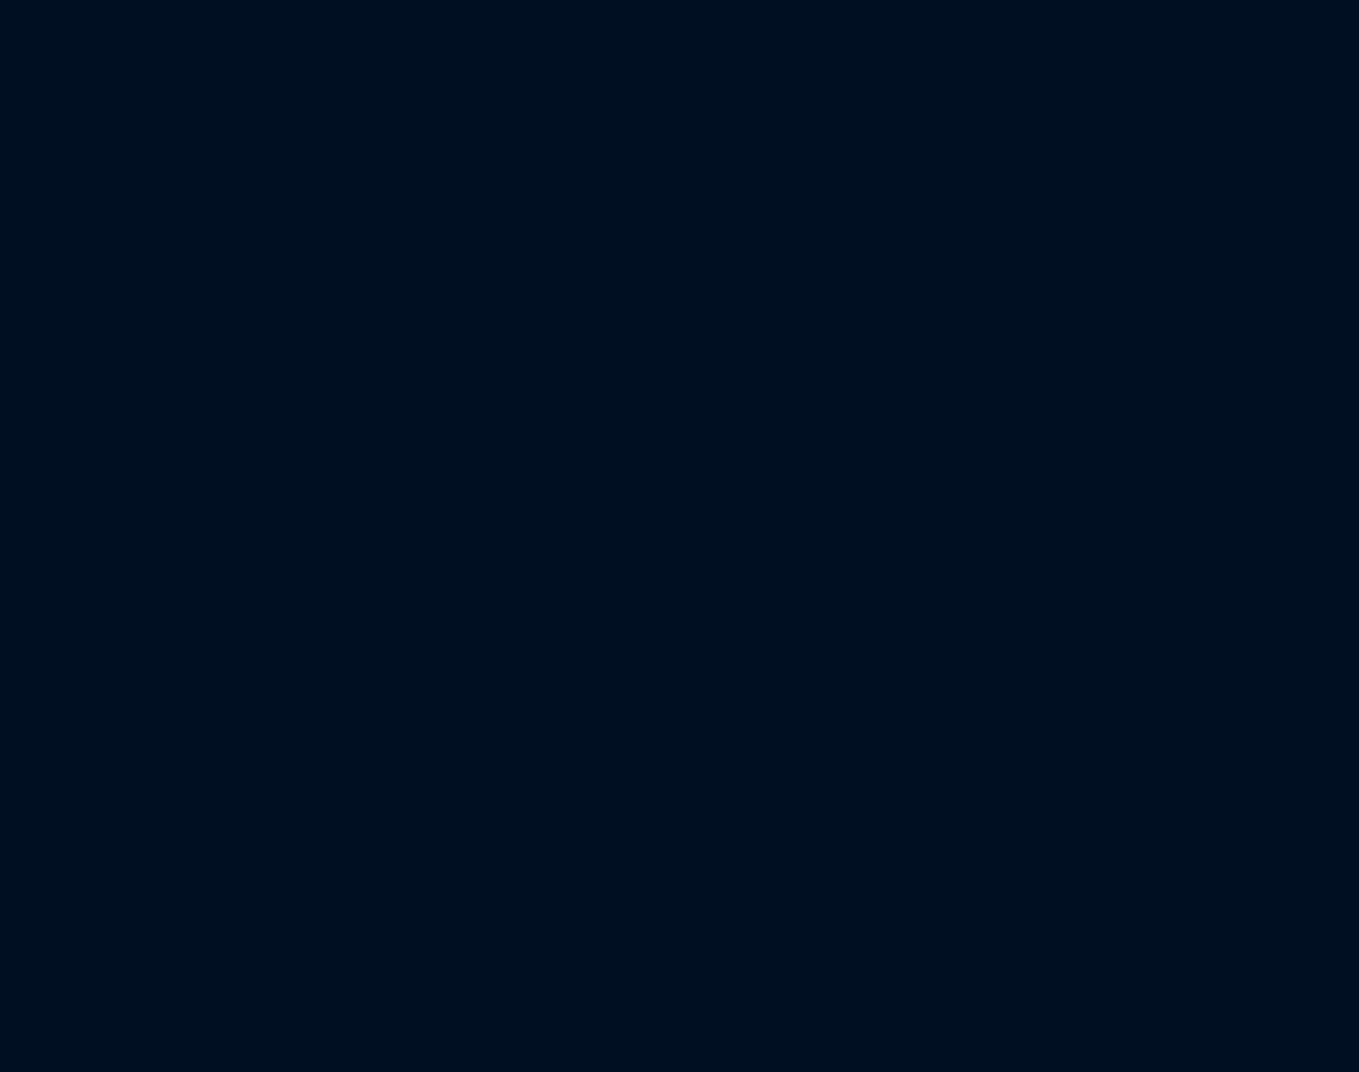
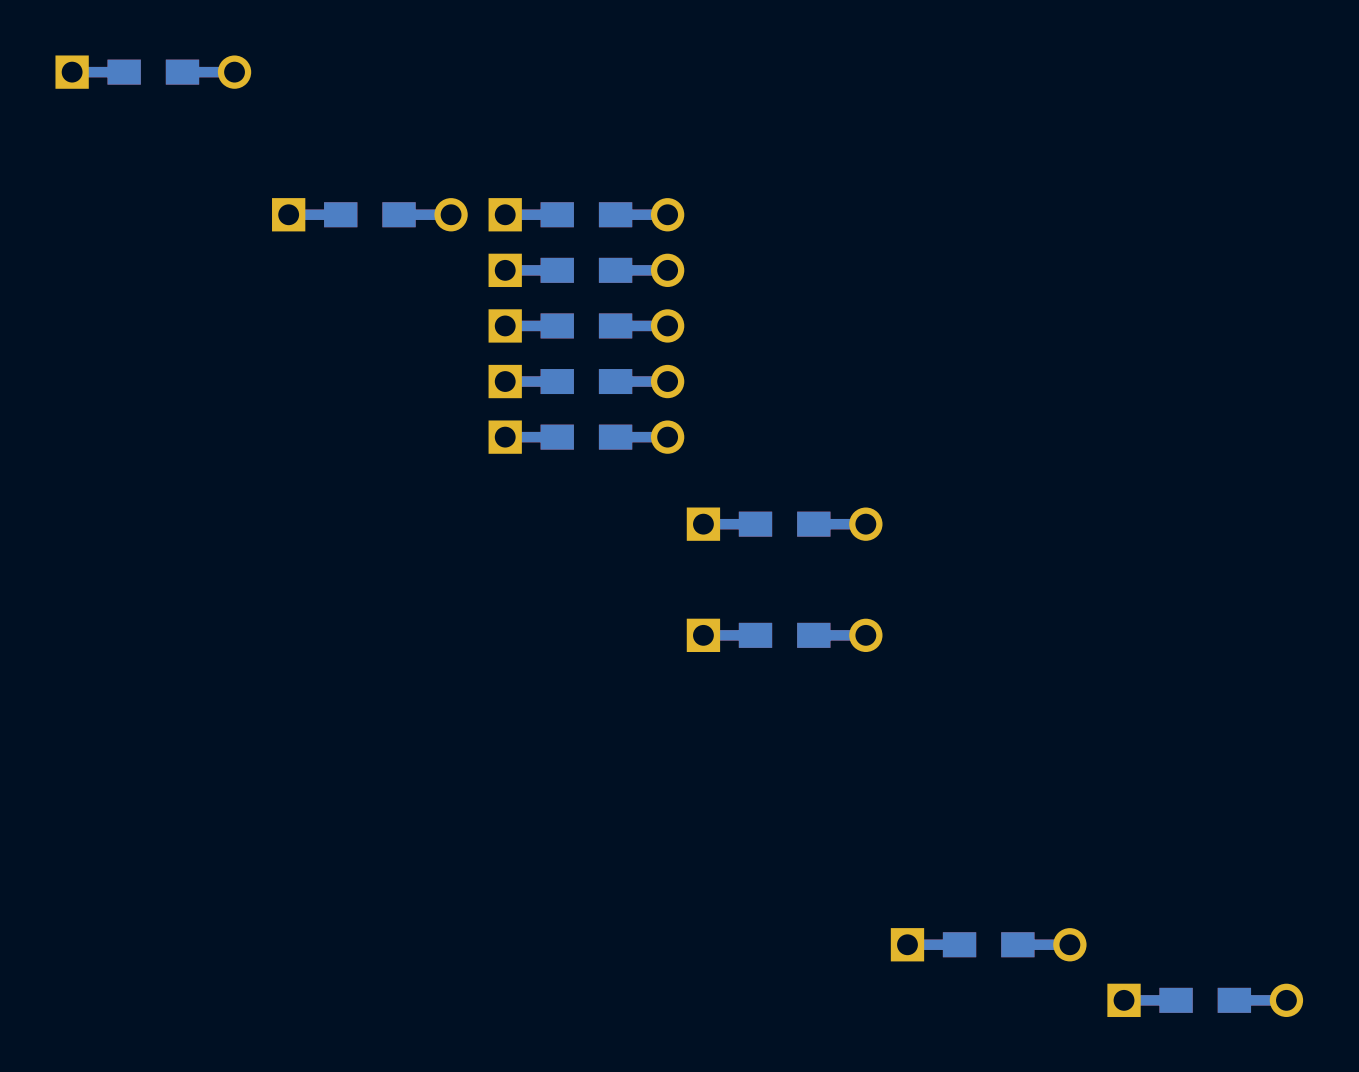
part: none -> (153, 72)
part: none -> (369, 214)
part: none -> (586, 214)
part: none -> (586, 270)
part: none -> (586, 325)
part: none -> (586, 381)
part: none -> (586, 437)
part: none -> (784, 524)
part: none -> (784, 635)
part: none -> (988, 944)
part: none -> (1205, 1000)

